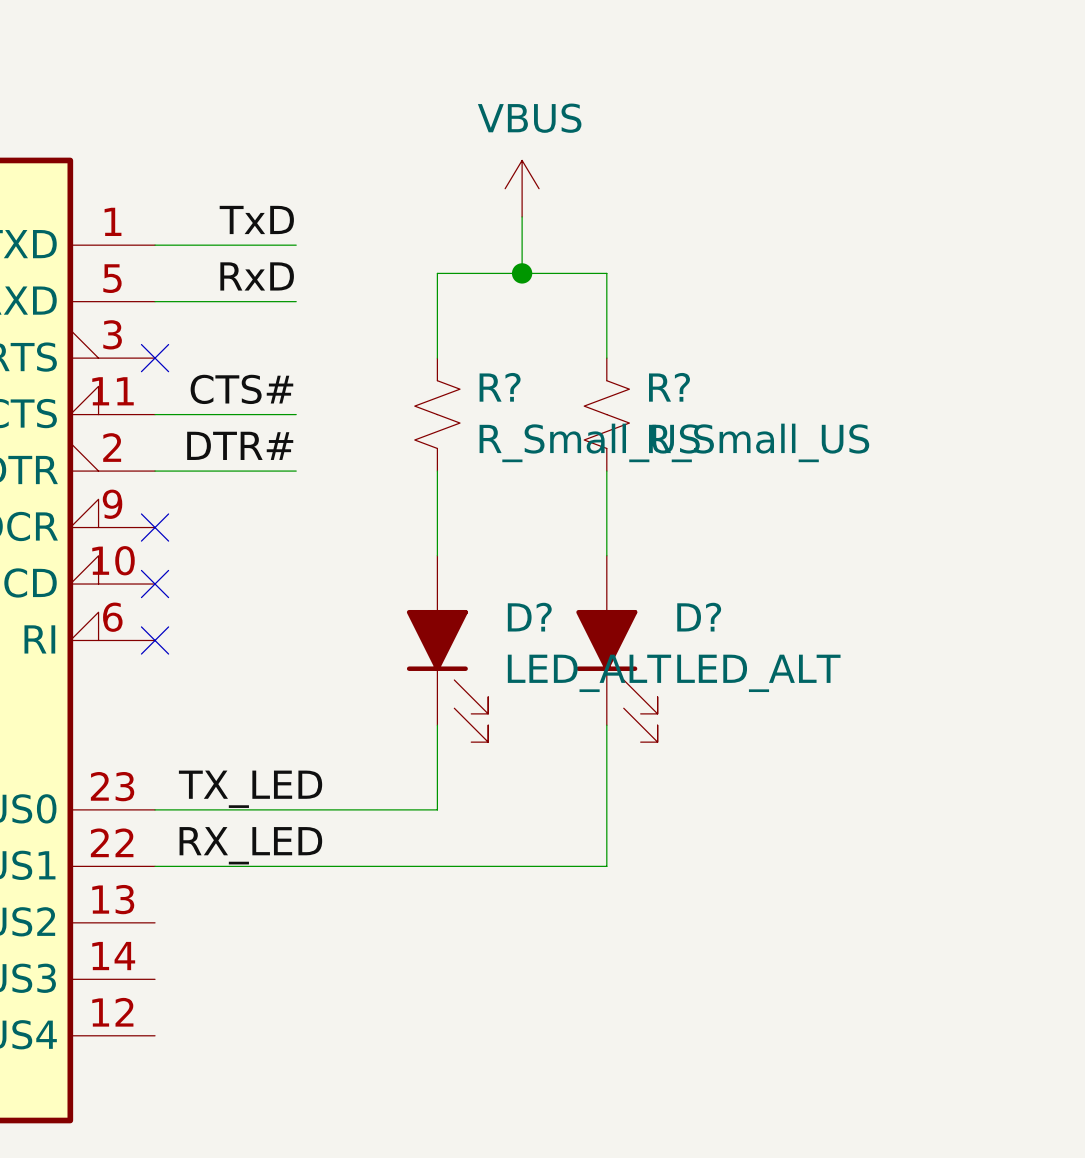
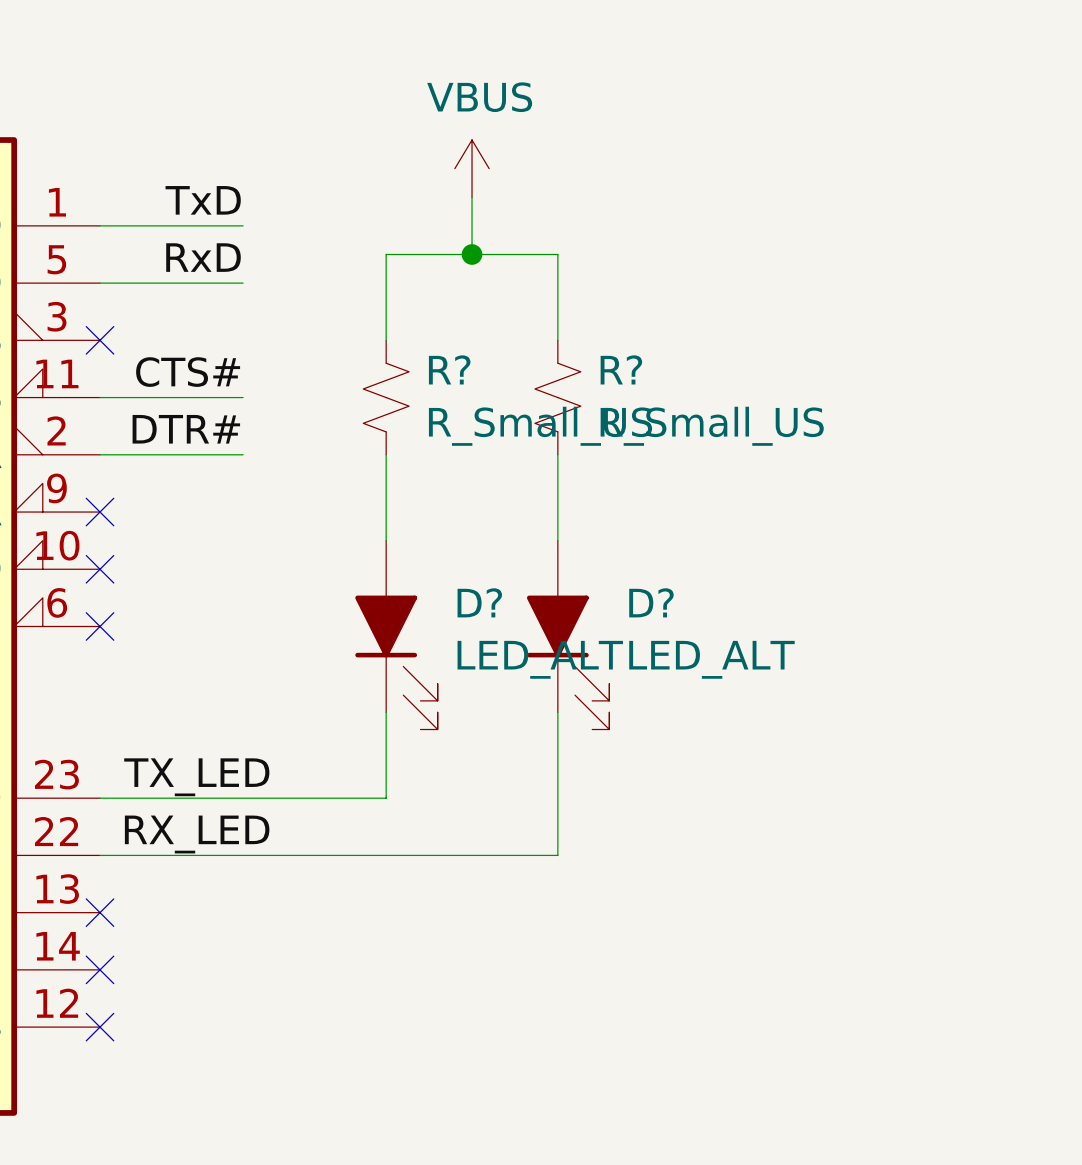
no-connect mark: none -> (100, 912)
no-connect mark: none -> (100, 969)
no-connect mark: none -> (100, 1027)

